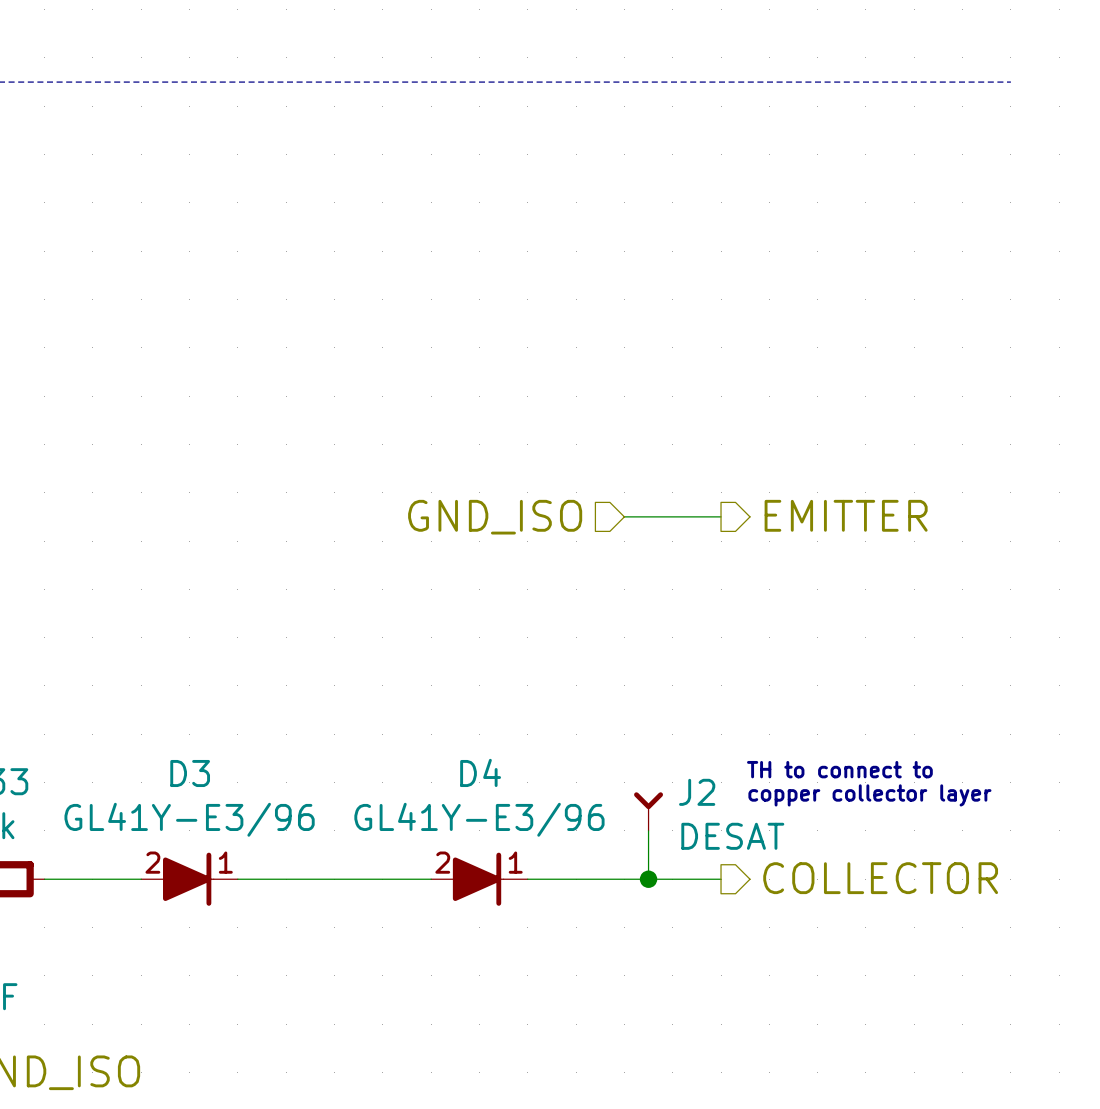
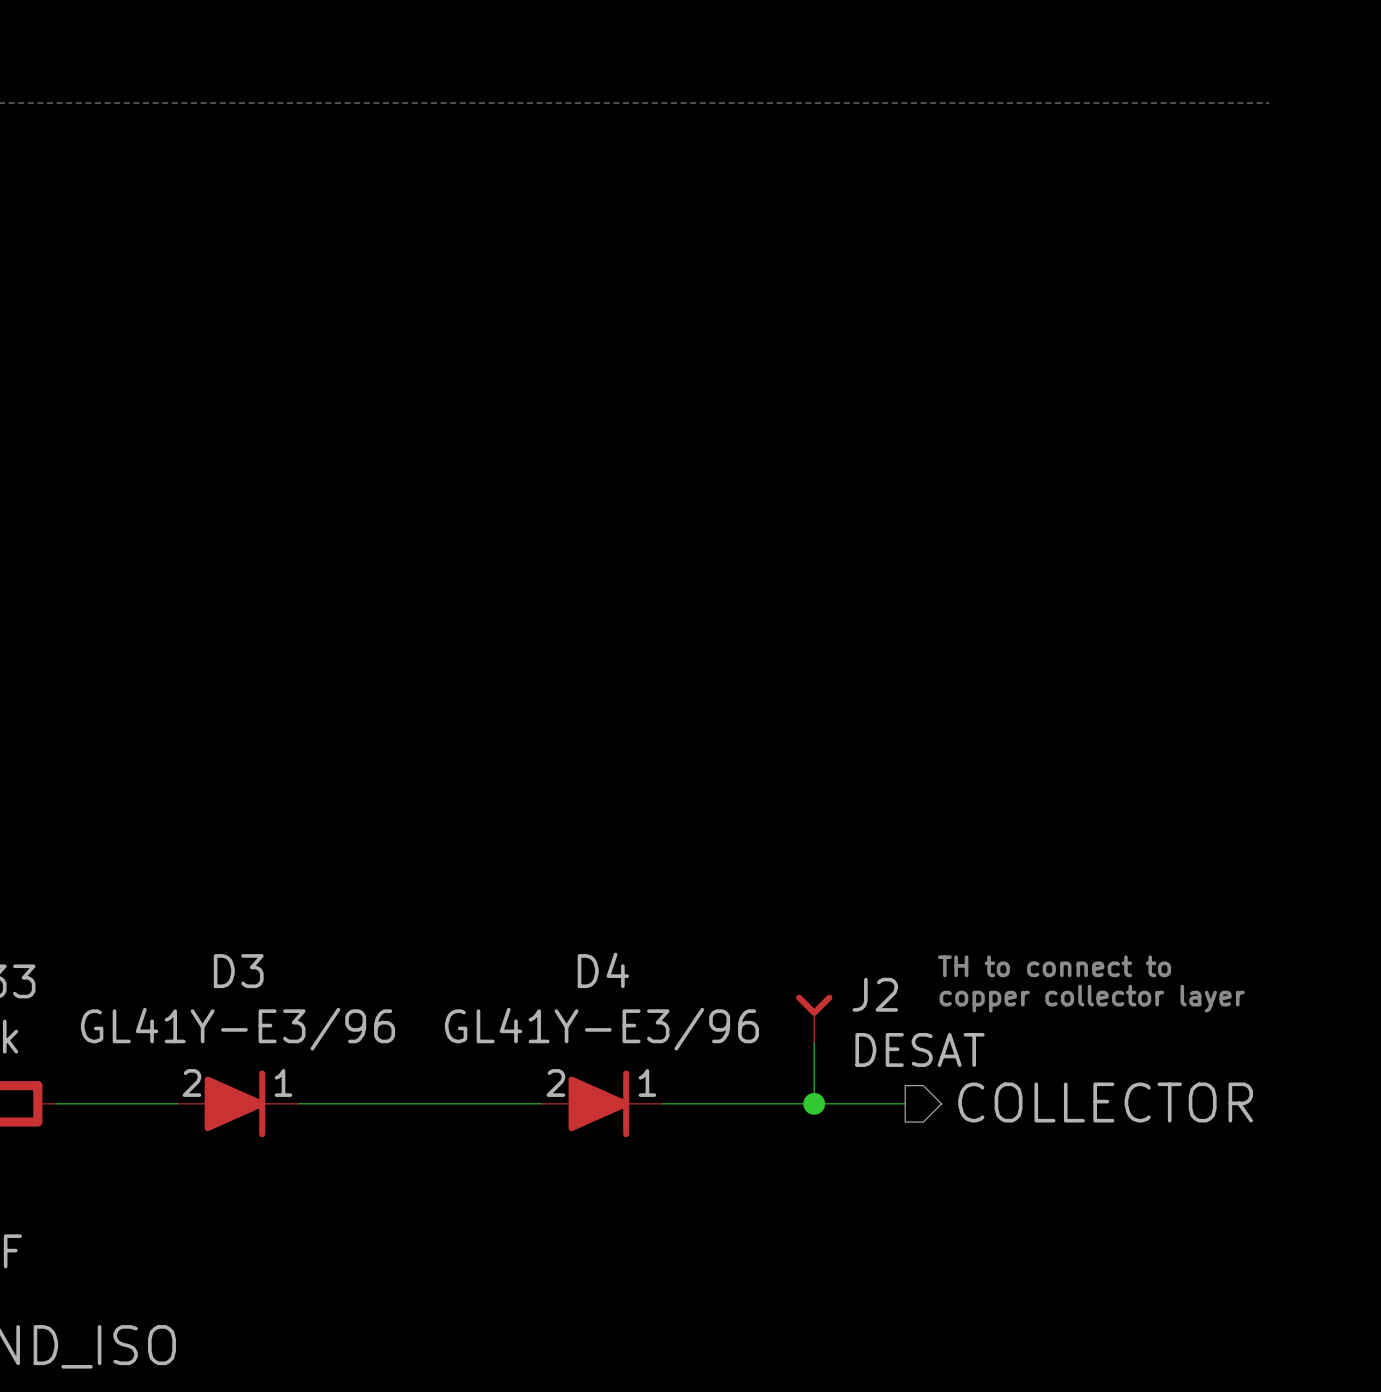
hierarchical label: EMITTER (846, 515) -> none
wire: (624, 516) (721, 516) -> none
hierarchical label: GND_ISO (495, 517) -> none

